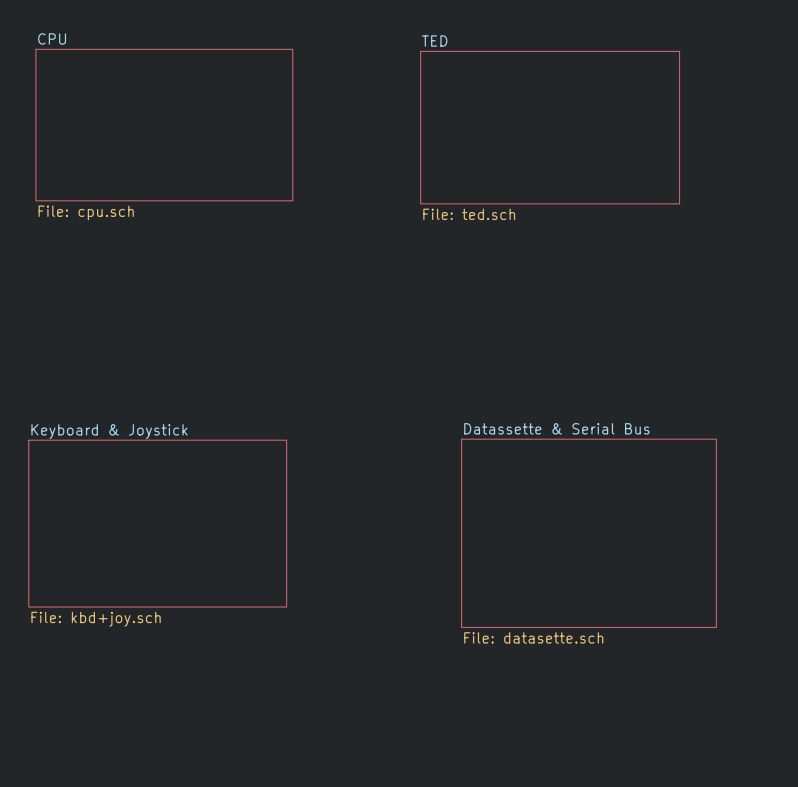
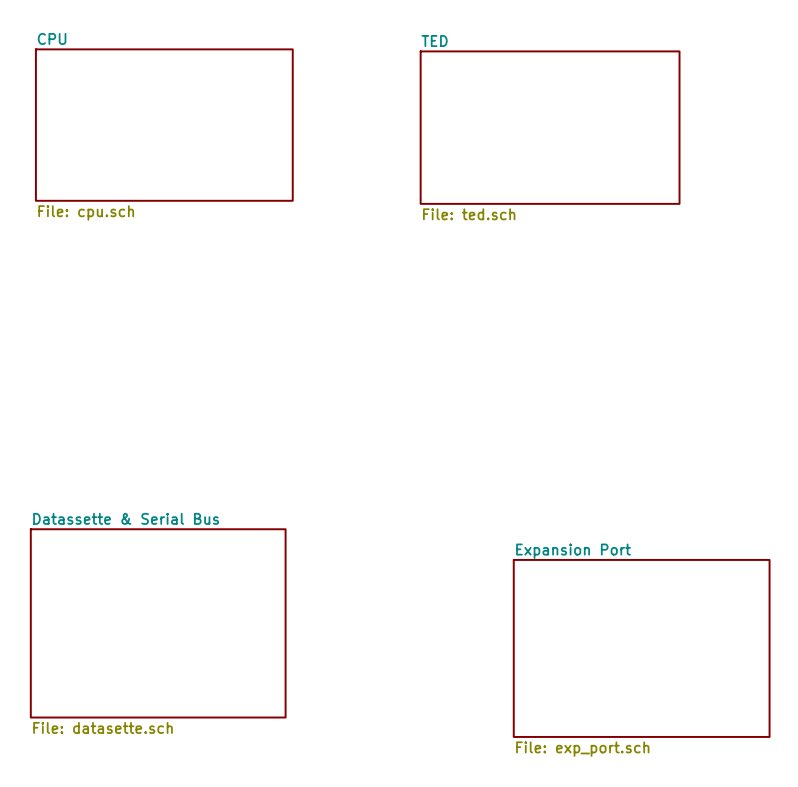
sheet Keyboard & Joystick: File: kbd+joy.sch (157, 523) -> none
sheet Datassette & Serial Bus: File: datasette.sch (588, 533) -> none
sheet Datassette & Serial Bus: none -> File: datasette.sch (158, 623)
sheet Expansion Port: none -> File: exp_port.sch (641, 648)

